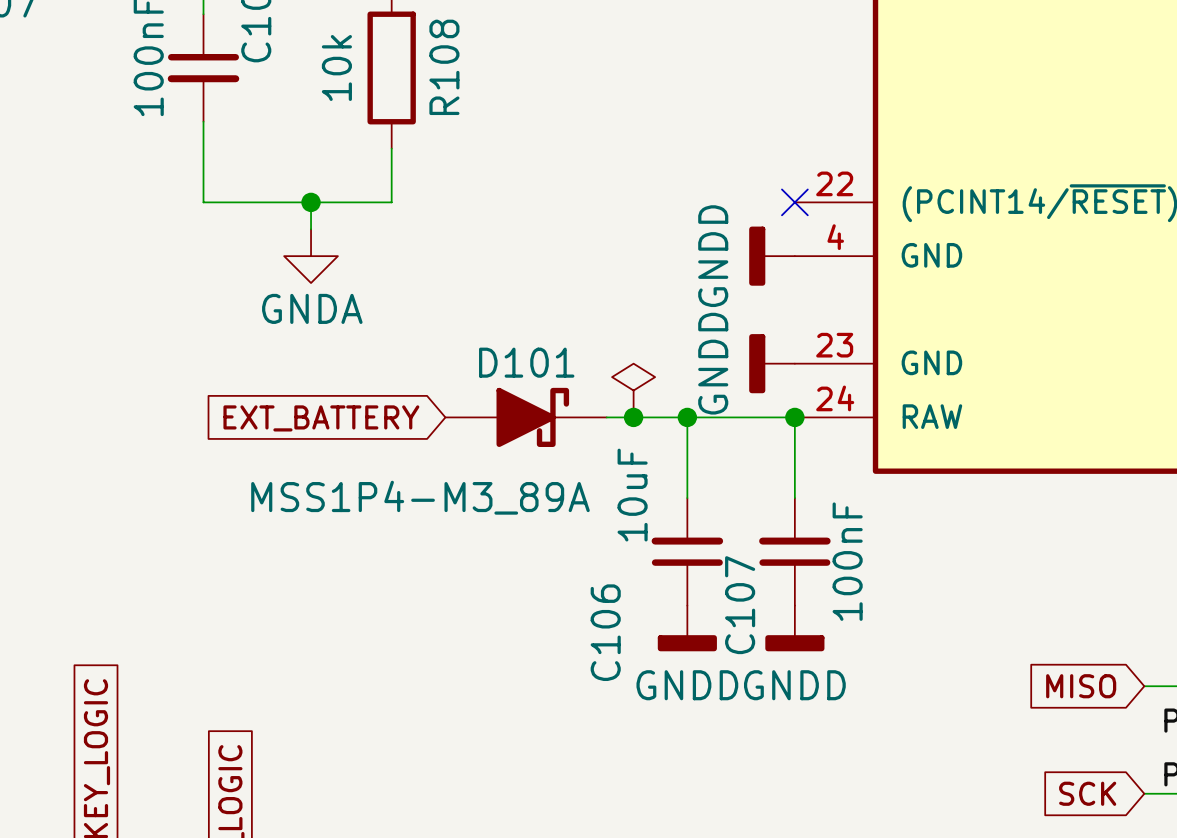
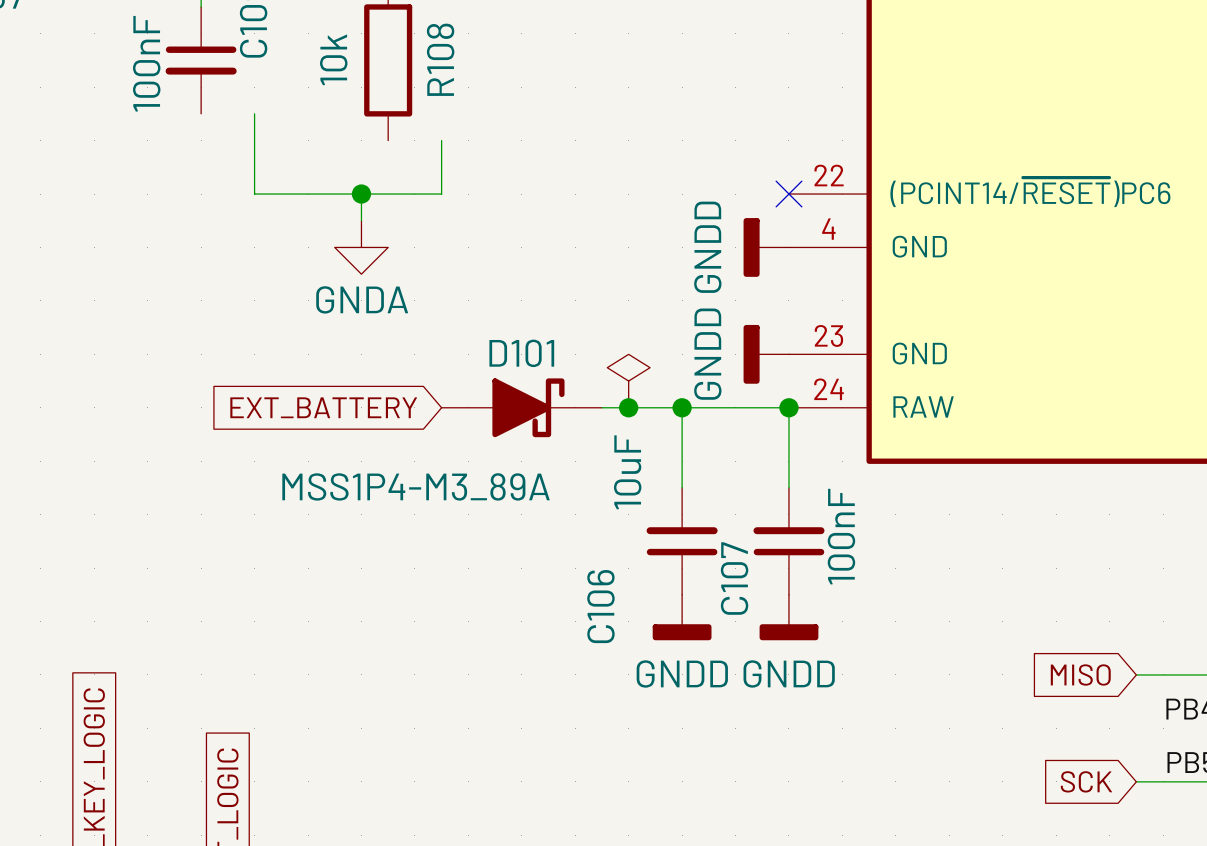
wire: (203, 121) (203, 202) (257, 202) -> (254, 113) (254, 194)
wire: (391, 148) (391, 202) -> (441, 140) (441, 194) (388, 194)
wire: (311, 202) (311, 229) -> (361, 194) (361, 220)
junction position: (311, 202) -> (361, 194)
power symbol position: GNDA (311, 256) -> GNDA (361, 247)

